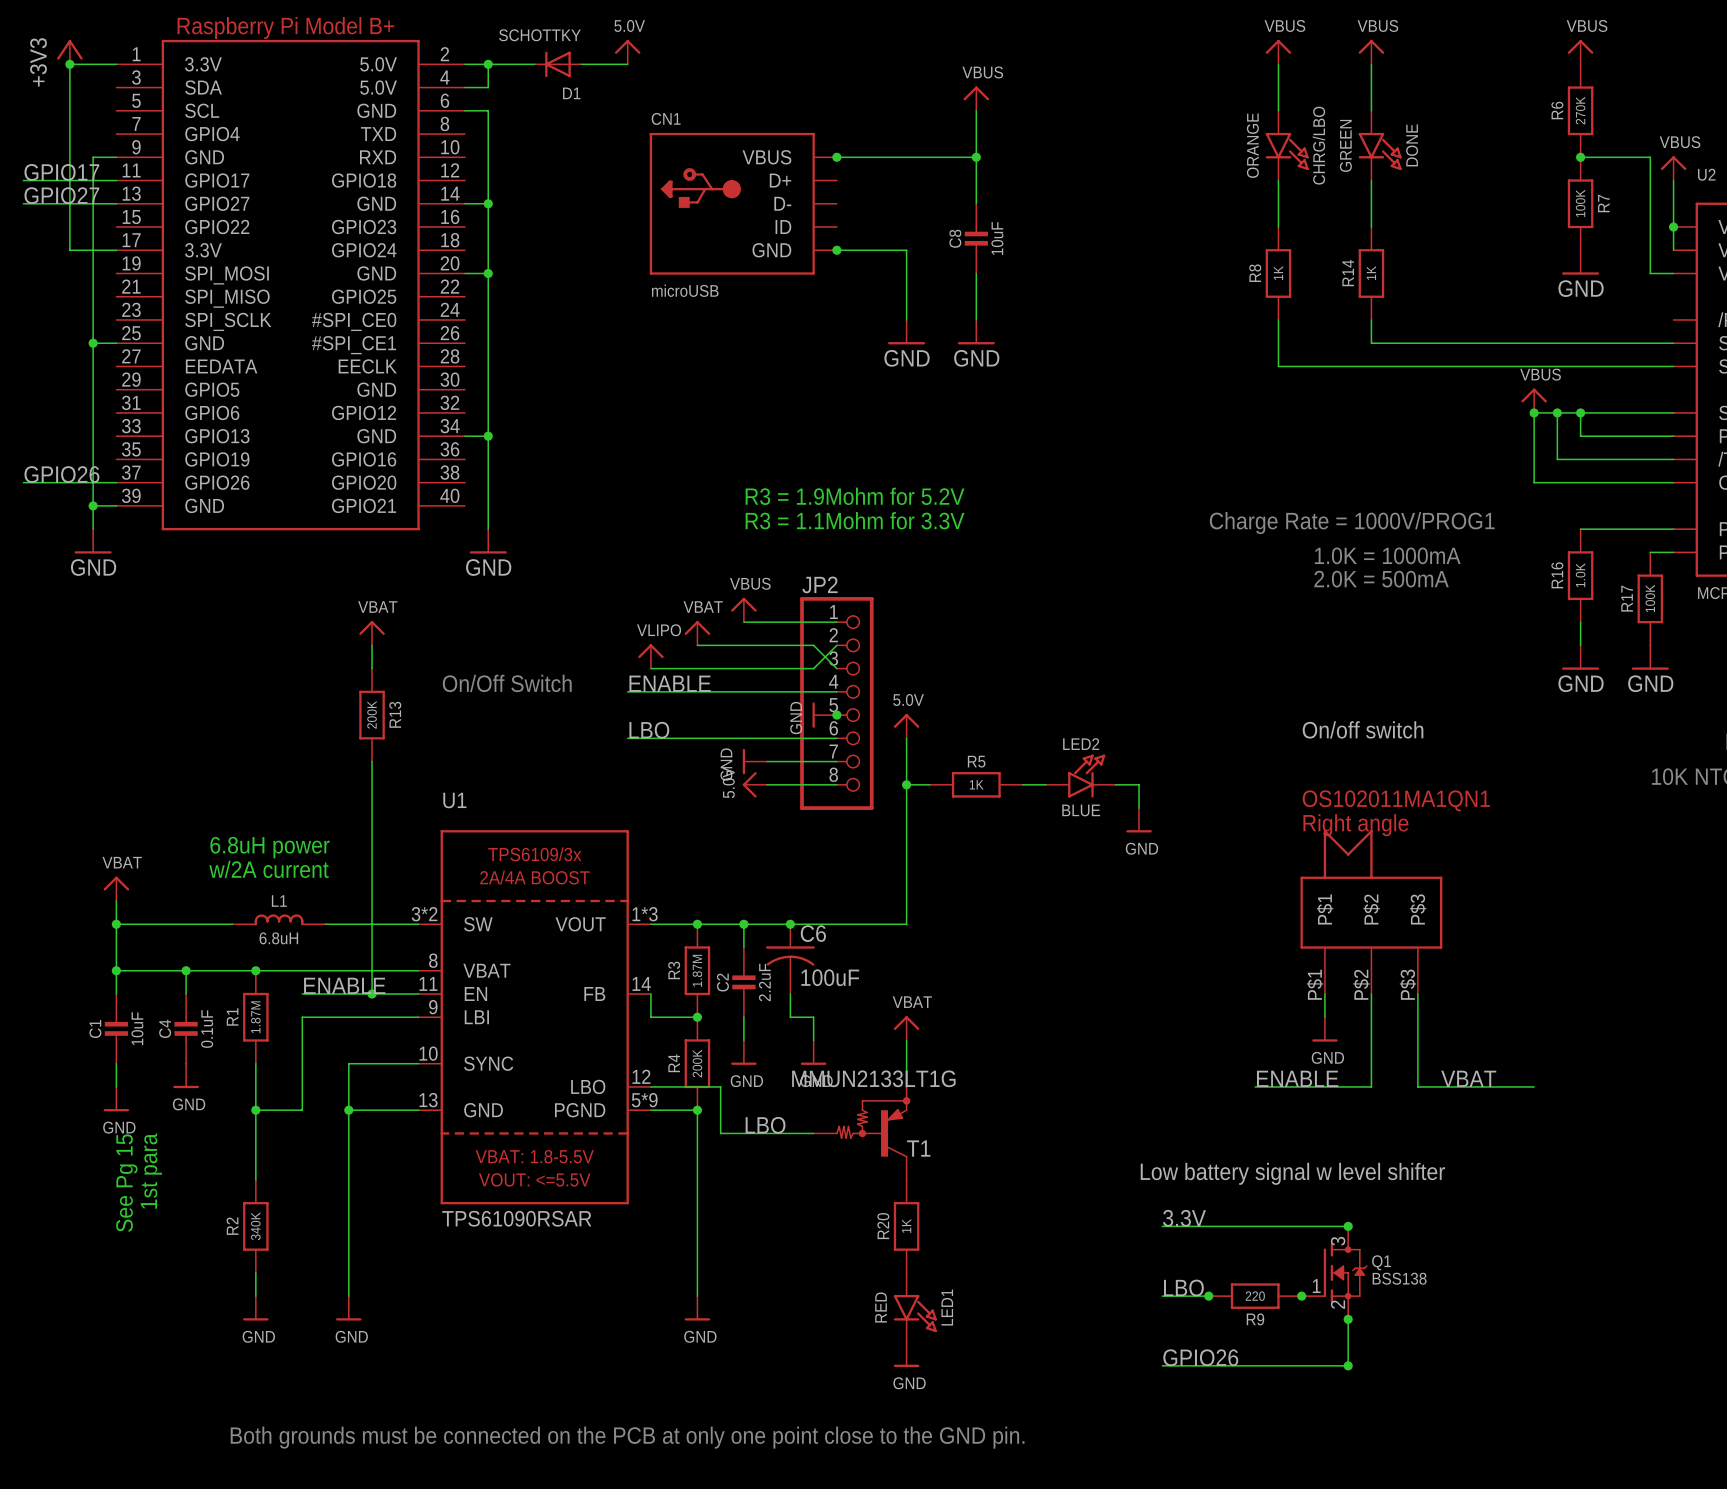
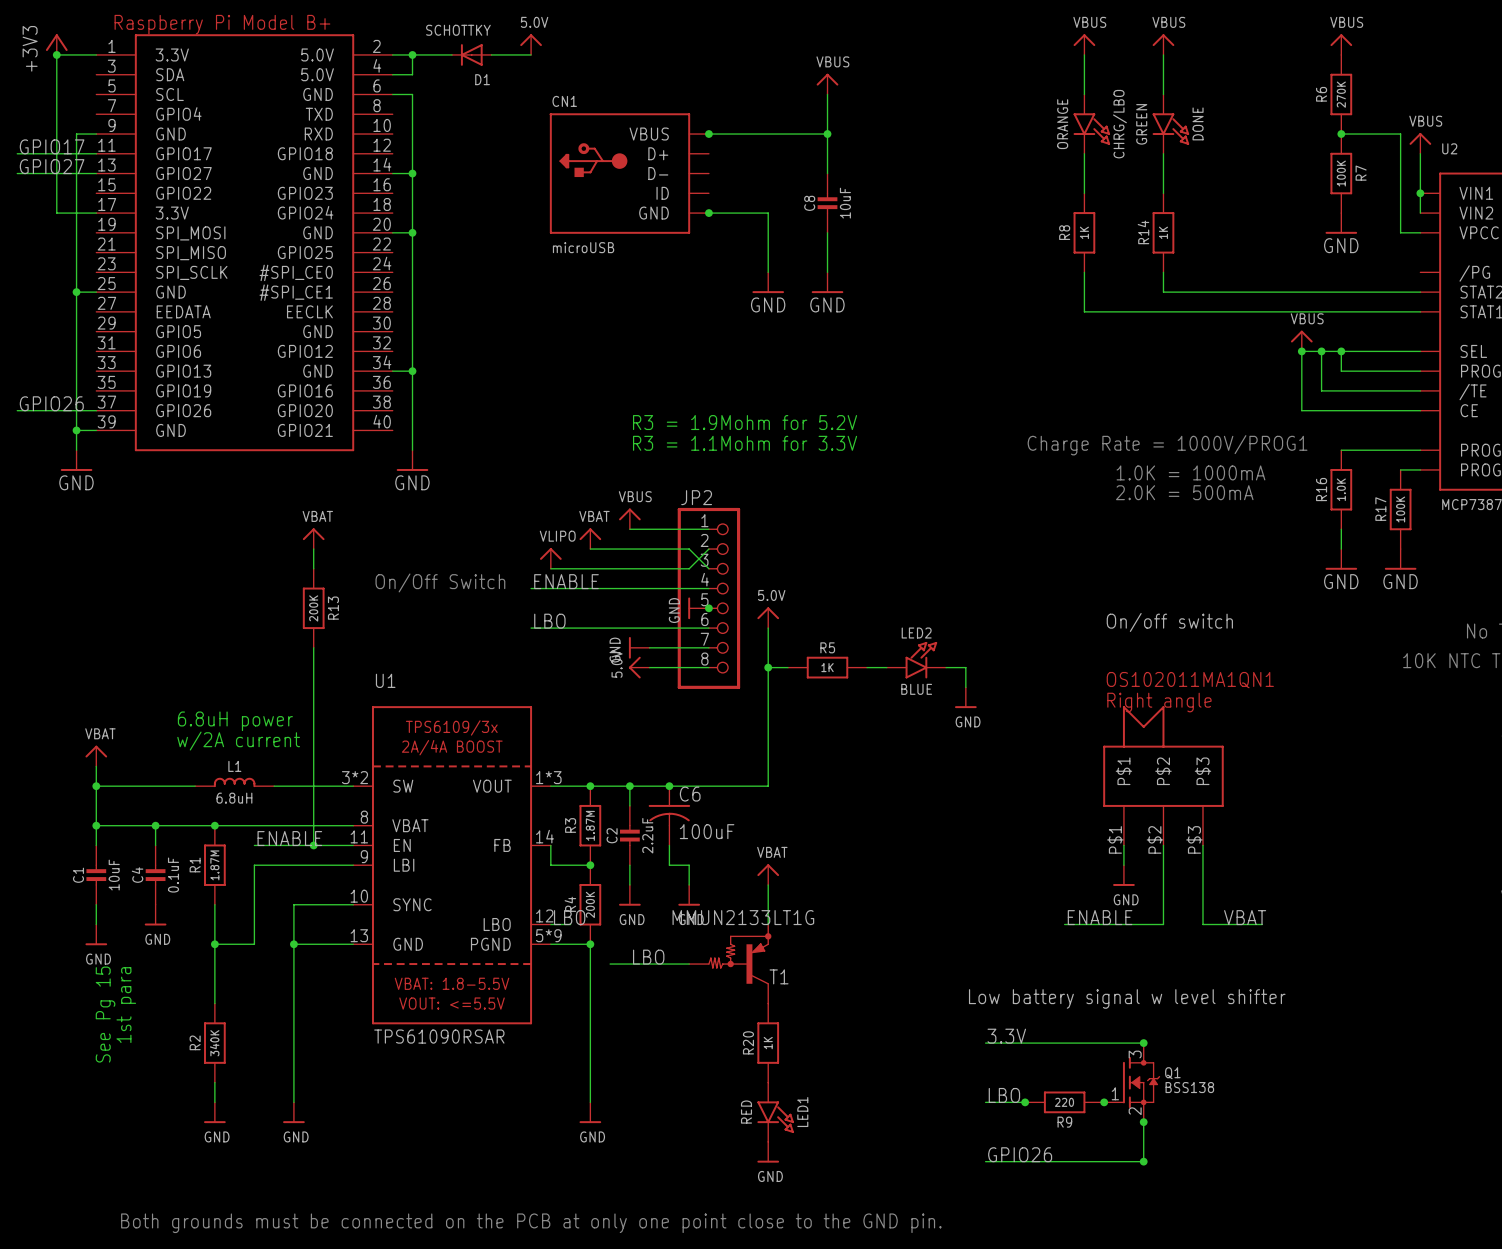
label: none -> LBO (569, 917)
wire: (674, 1086) (720, 1086) (720, 1133) -> none
wire: (1487, 1086) (1534, 1086) -> none

